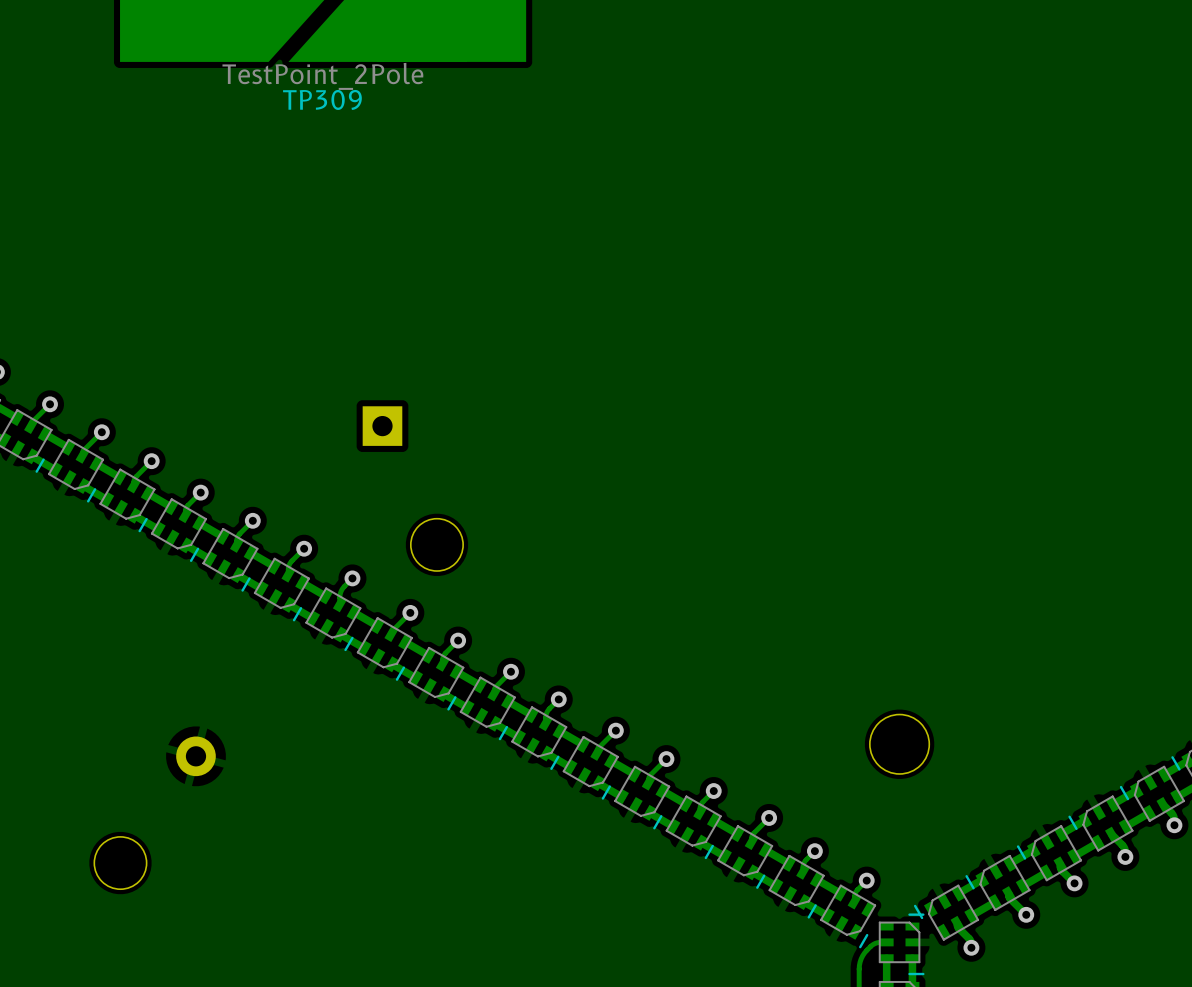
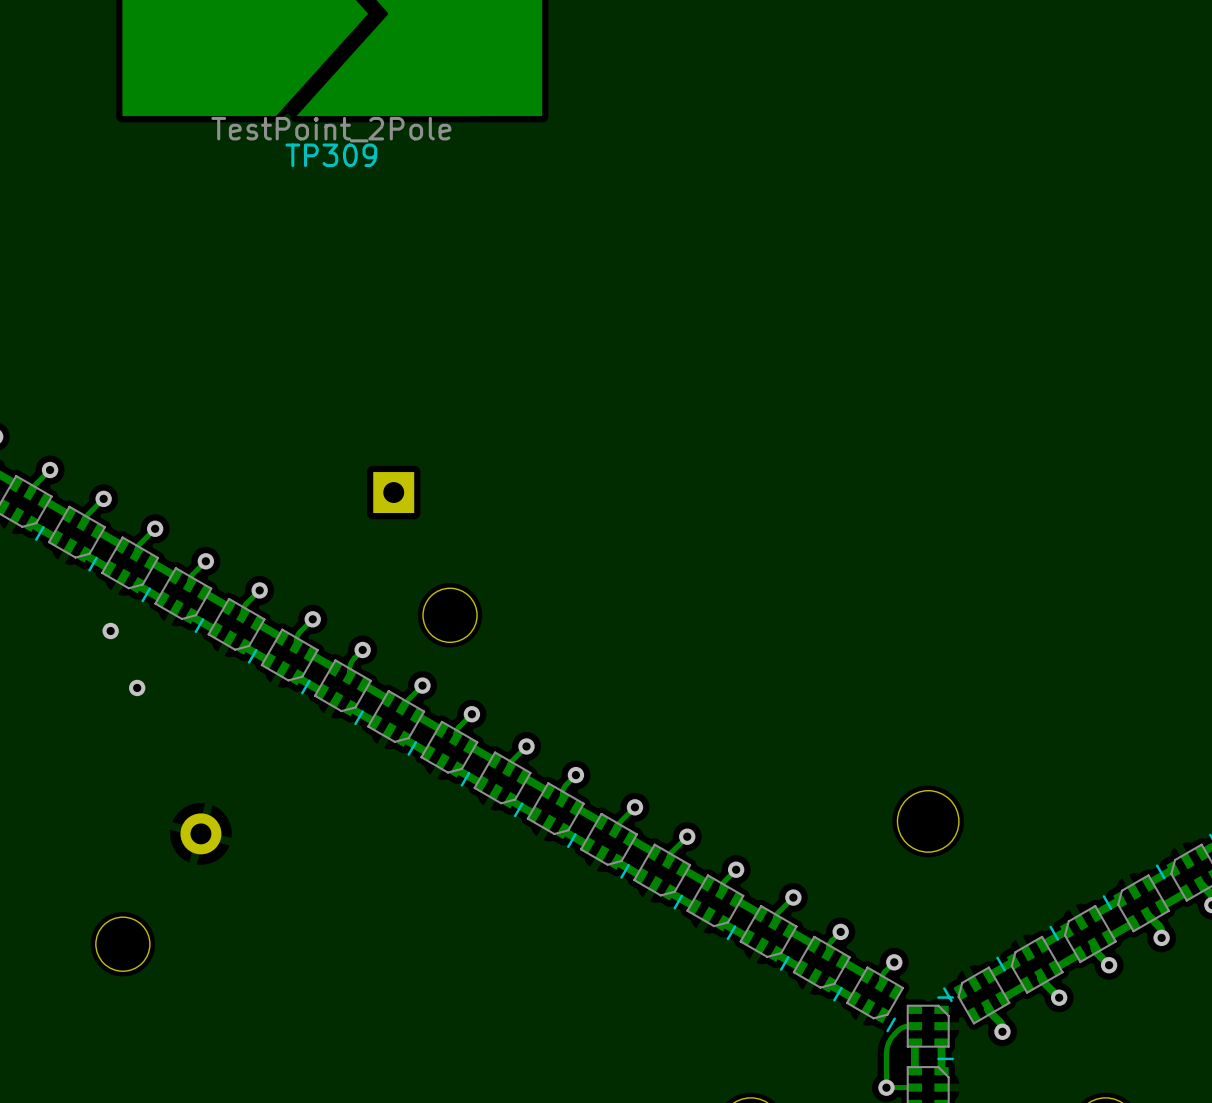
via: none -> (110, 631)
via: none -> (137, 687)

